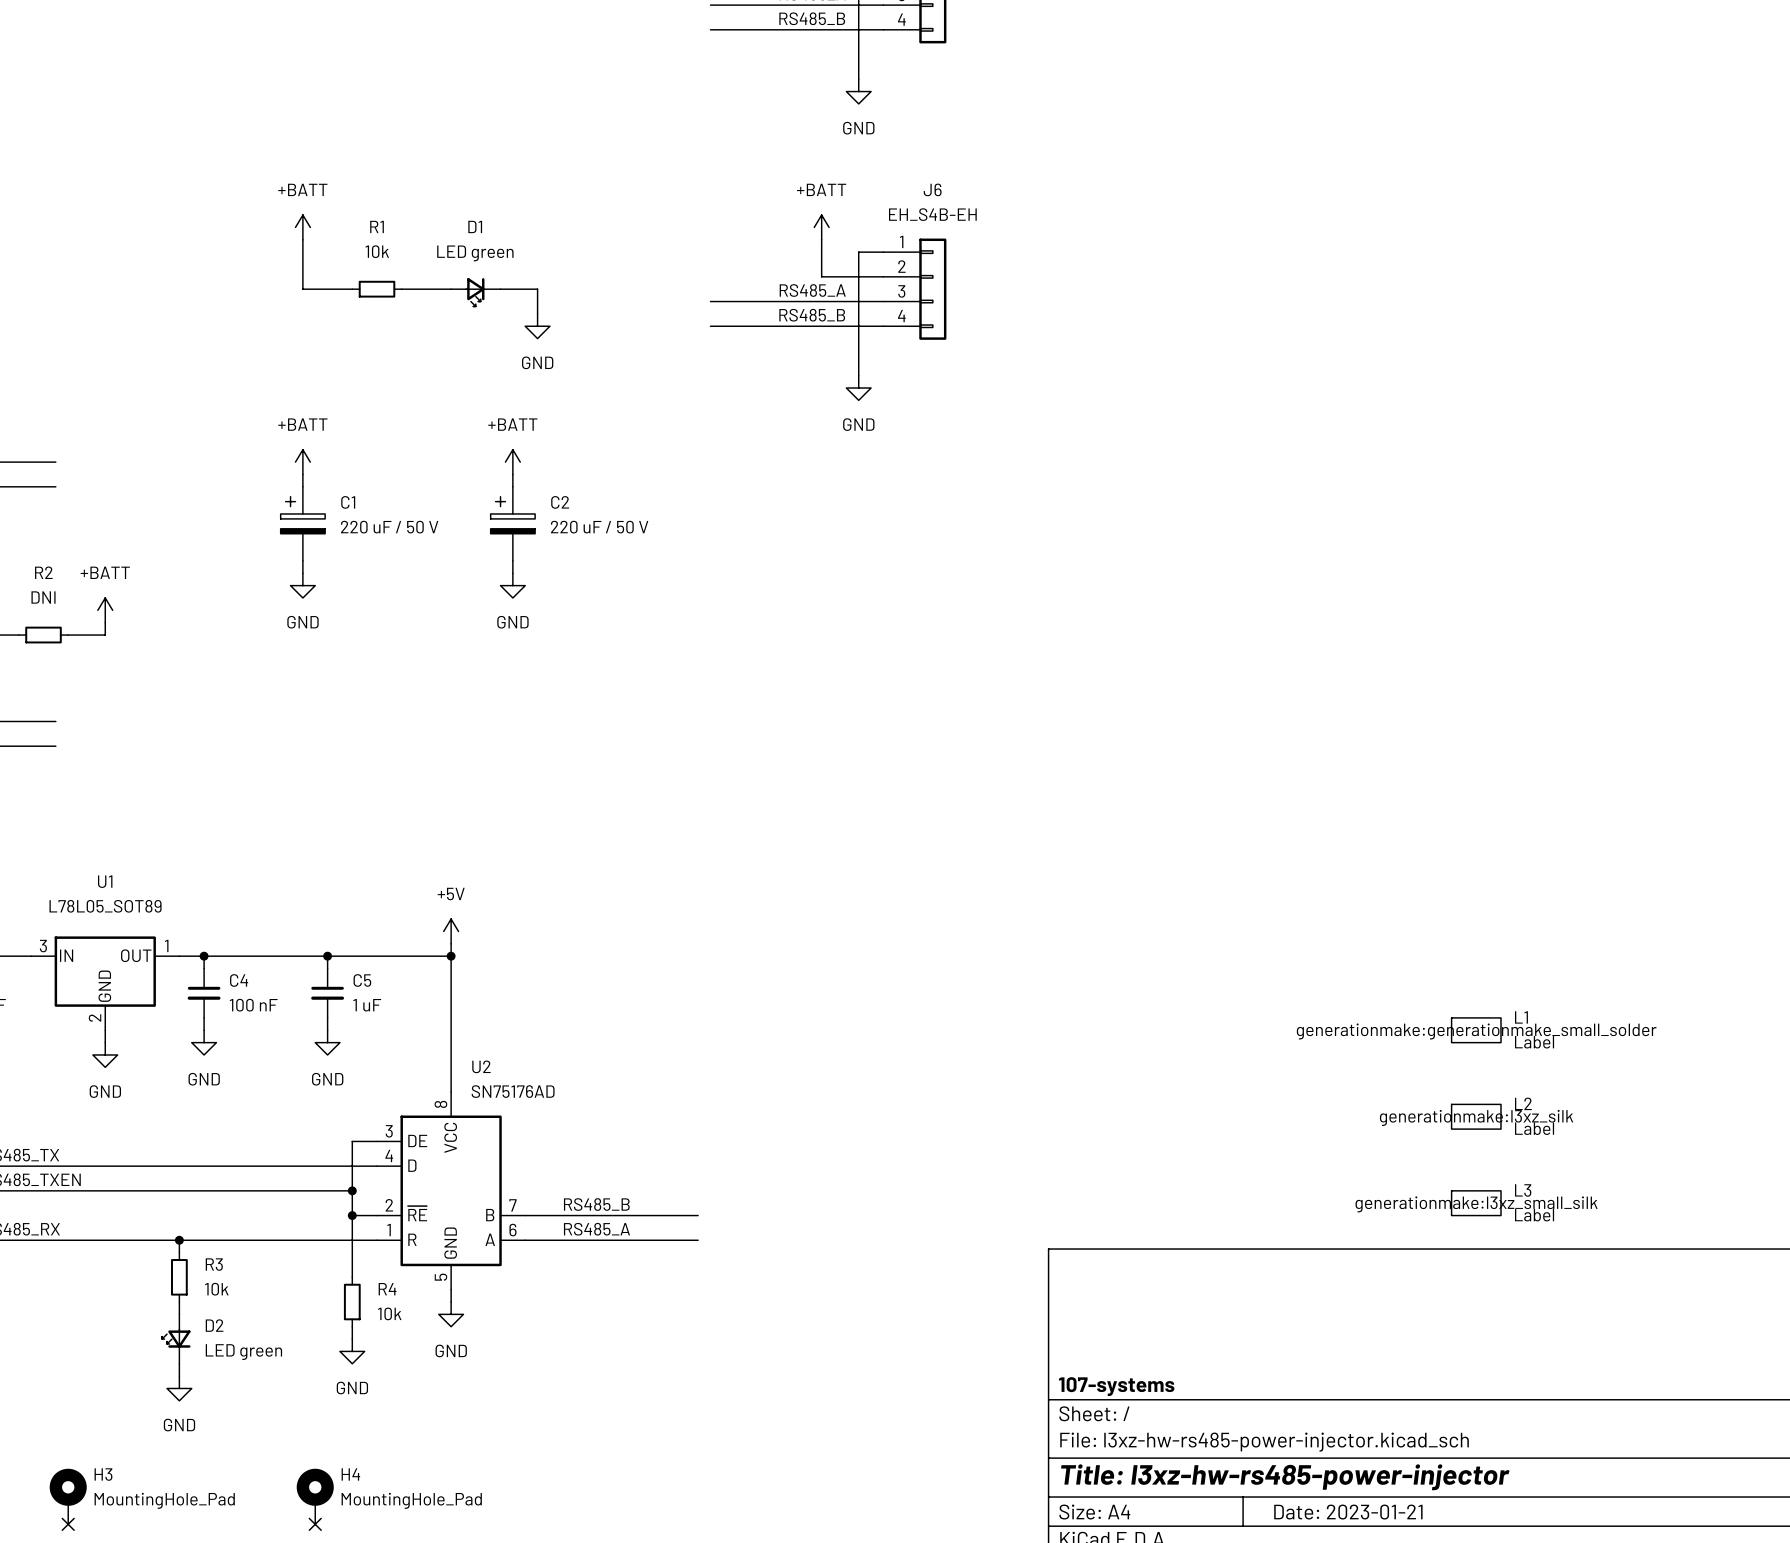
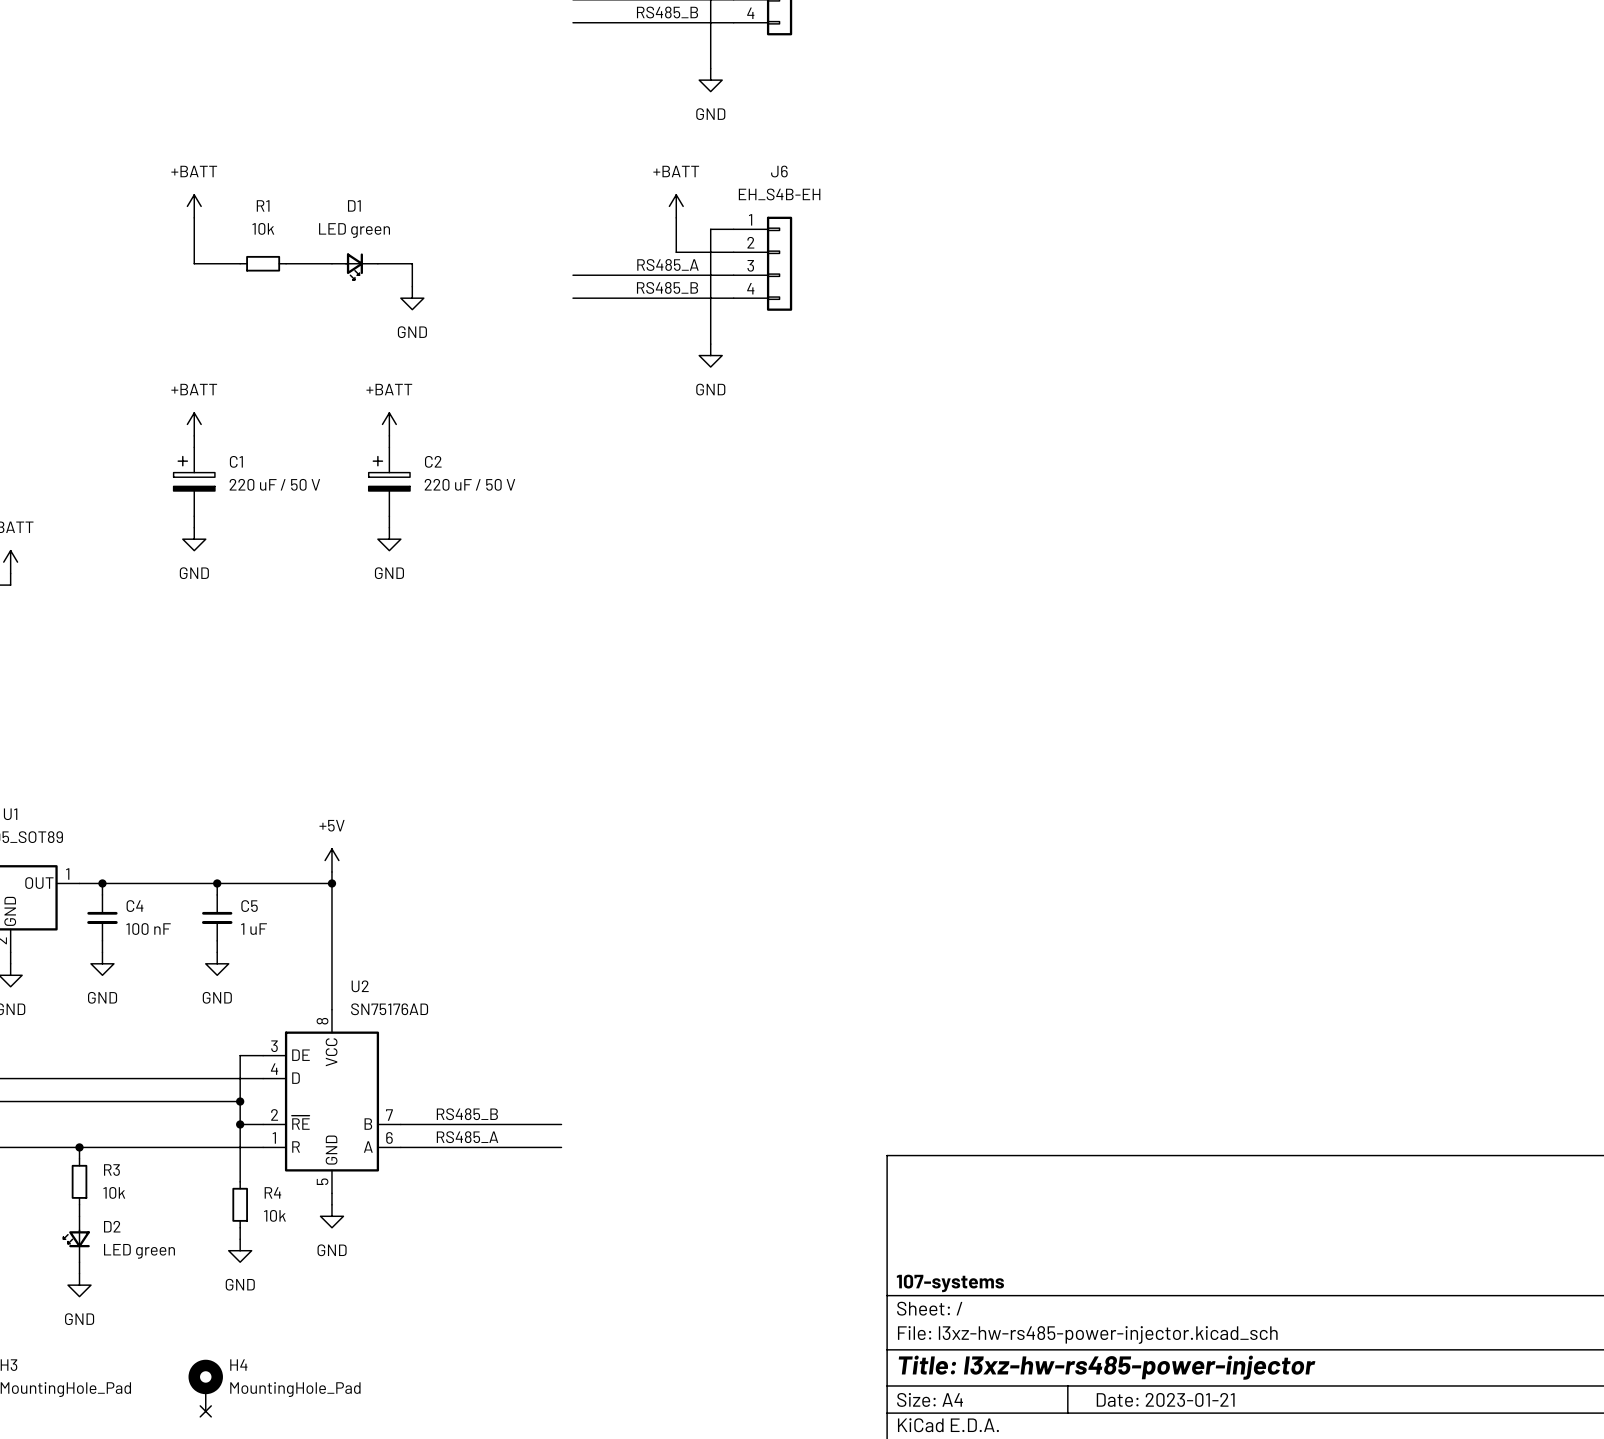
L1: Label (1476, 1030) -> none
L2: Label (1476, 1116) -> none
L3: Label (1476, 1203) -> none

